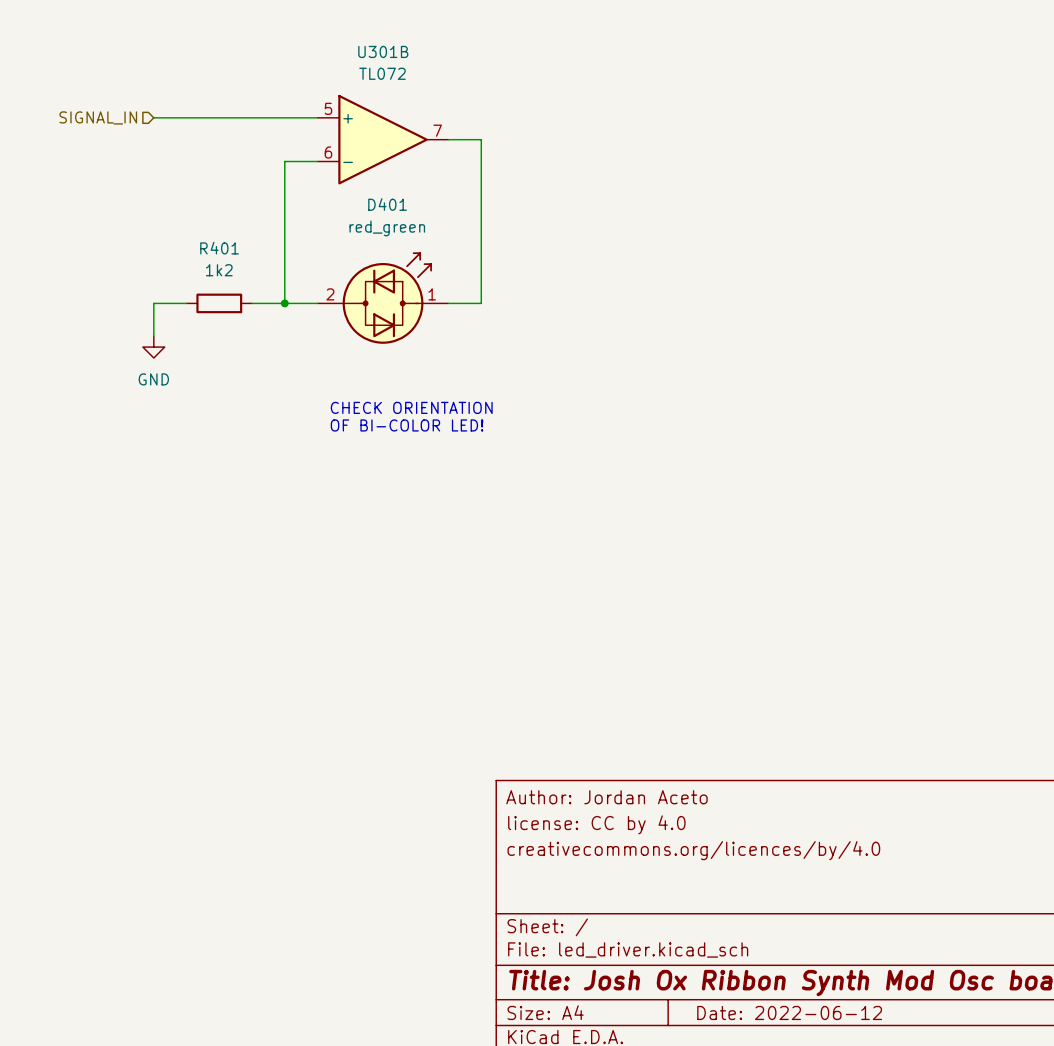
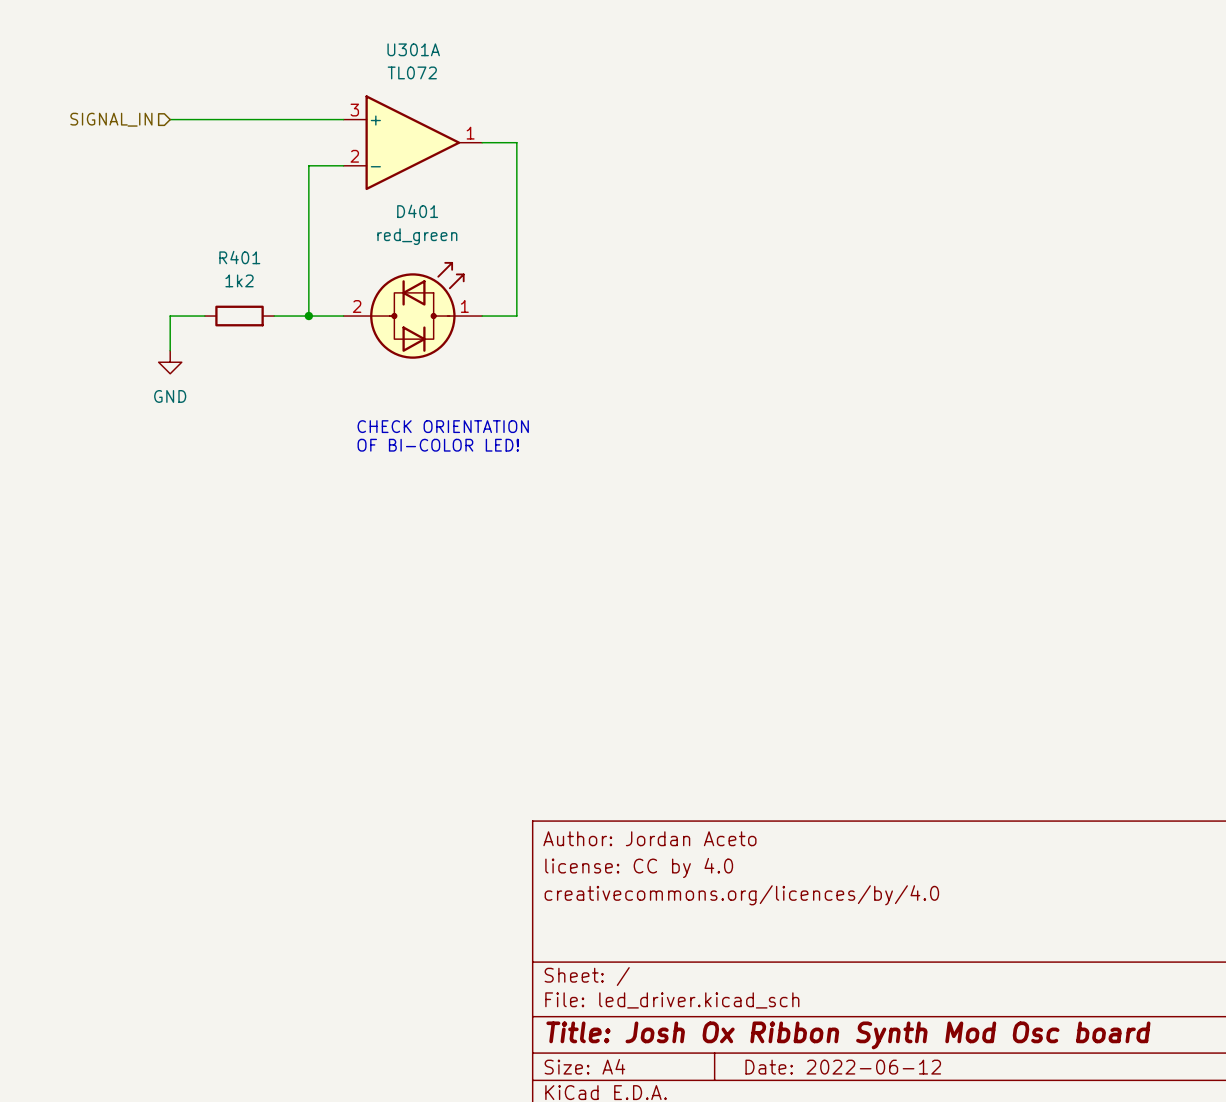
U301B name: U301B (383, 51) -> U301A (413, 49)
U301B pin number: 5 (328, 108) -> 3 (354, 110)
U301B pin number: 7 (437, 130) -> 1 (470, 133)
U301B pin number: 6 (328, 152) -> 2 (354, 156)

